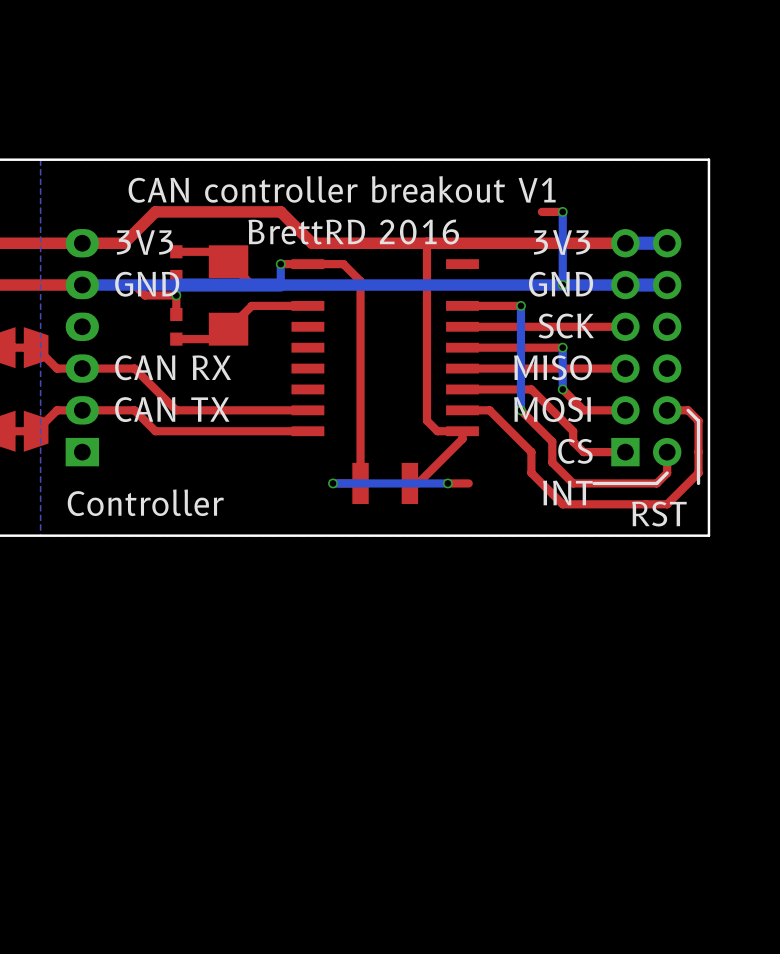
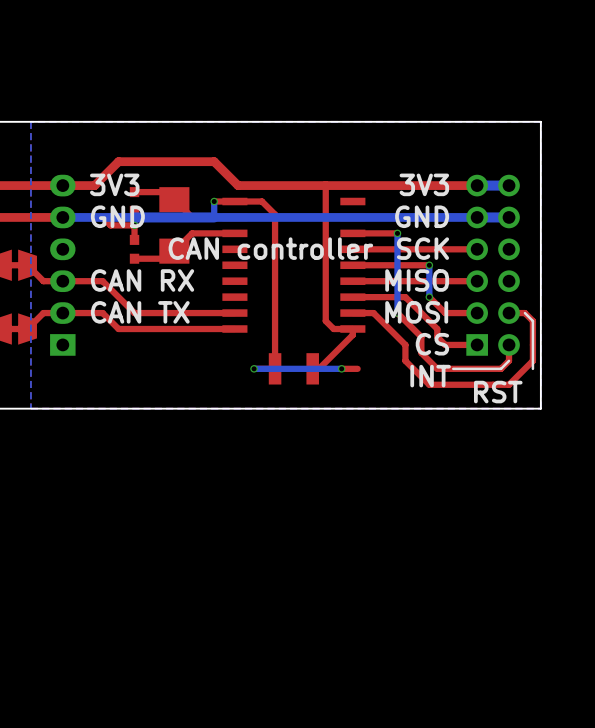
text: CAN controller breakout V1 (342, 189) -> none
top track: (562, 211) (541, 211) -> none
bottom track: (562, 211) (562, 285) -> none
via: (562, 211) -> none
text: BrettRD 2016 (353, 232) -> none
via: (562, 285) -> none
text: none -> CAN controller (270, 248)
text: Controller (145, 502) -> none

